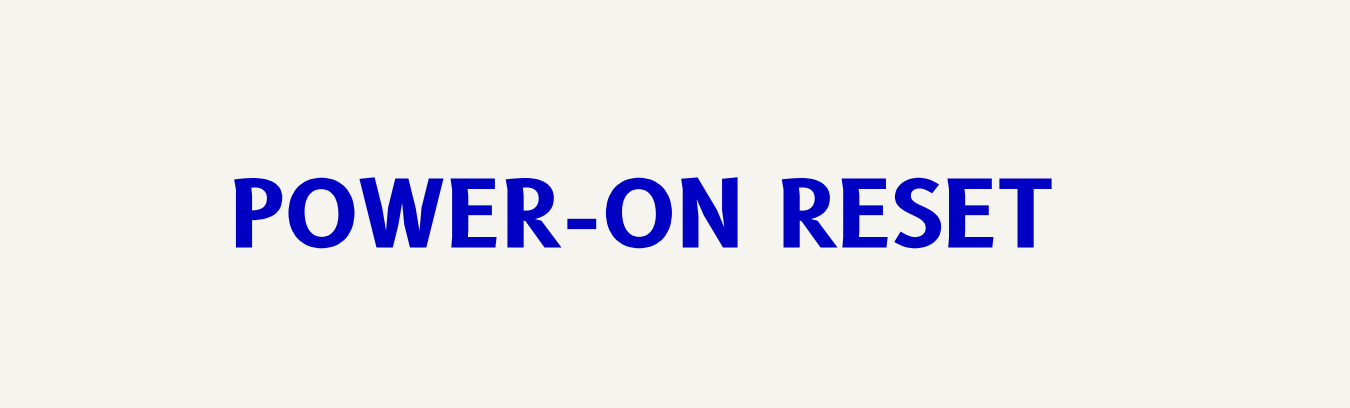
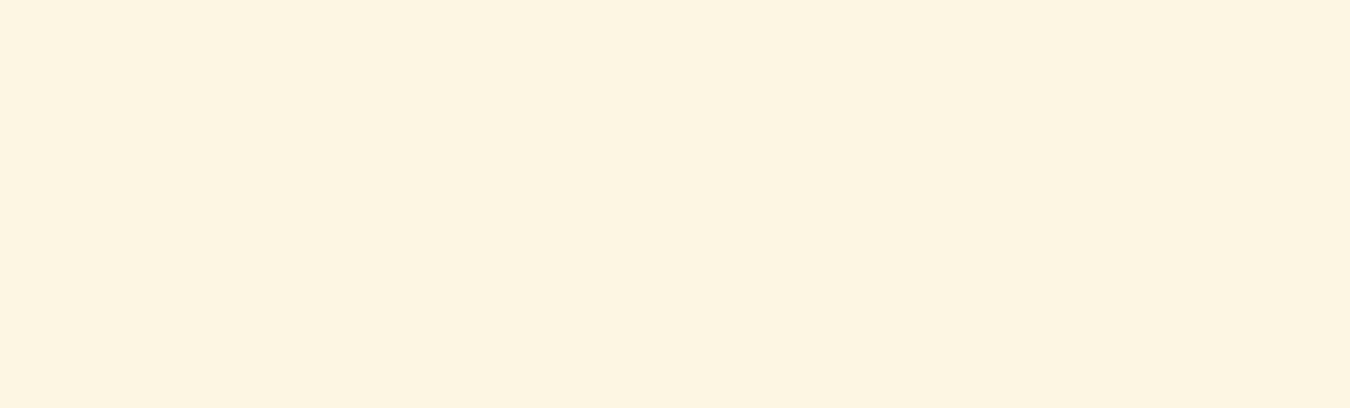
text: POWER-ON RESET (642, 212) -> none

